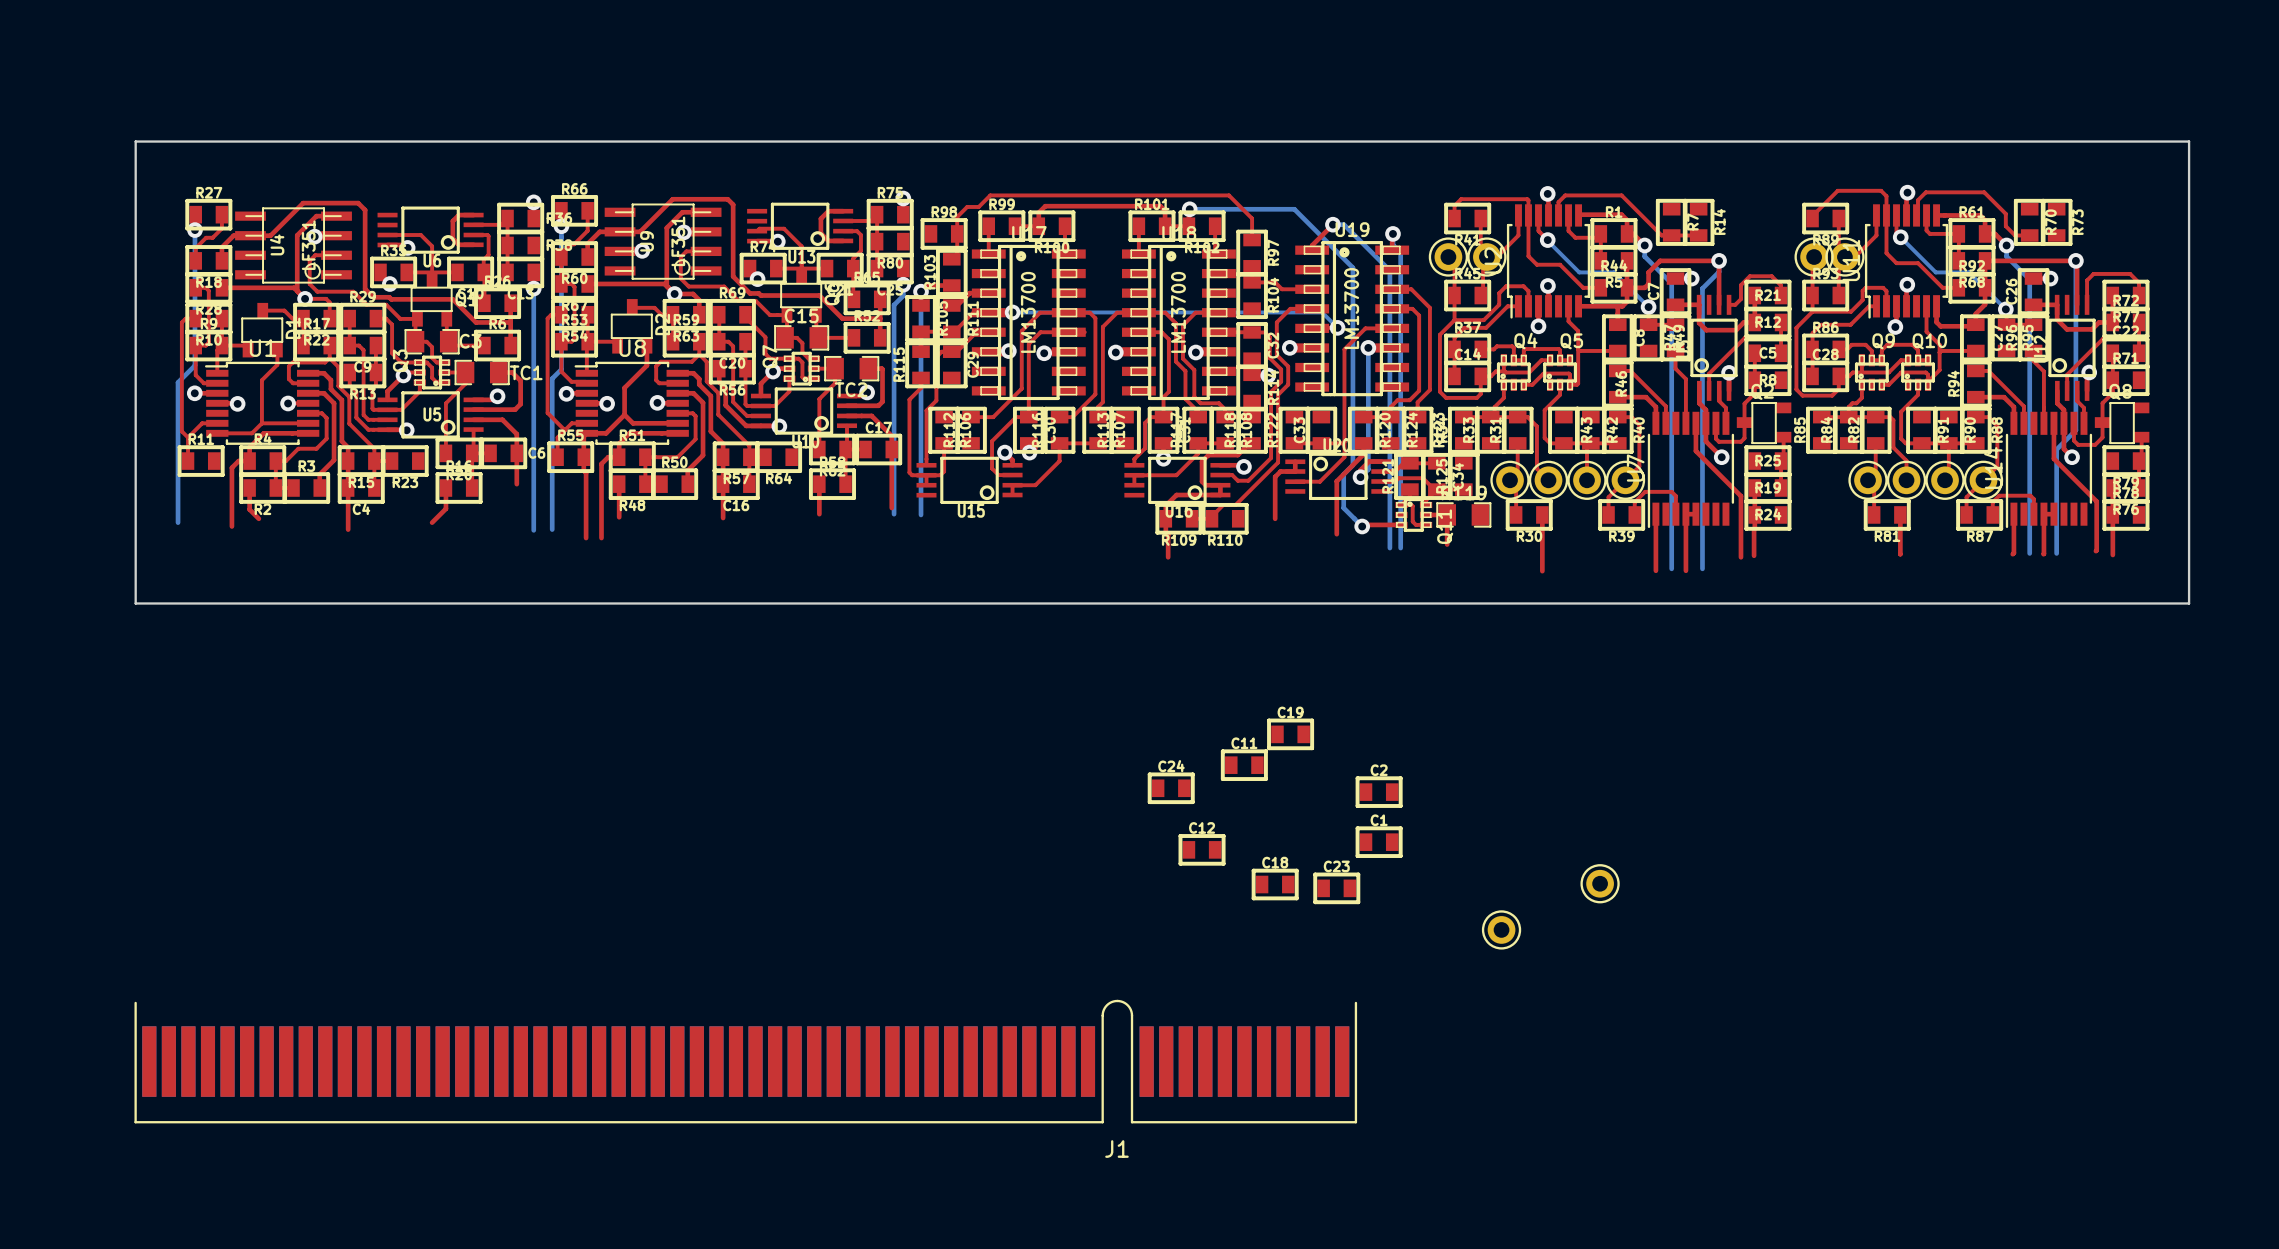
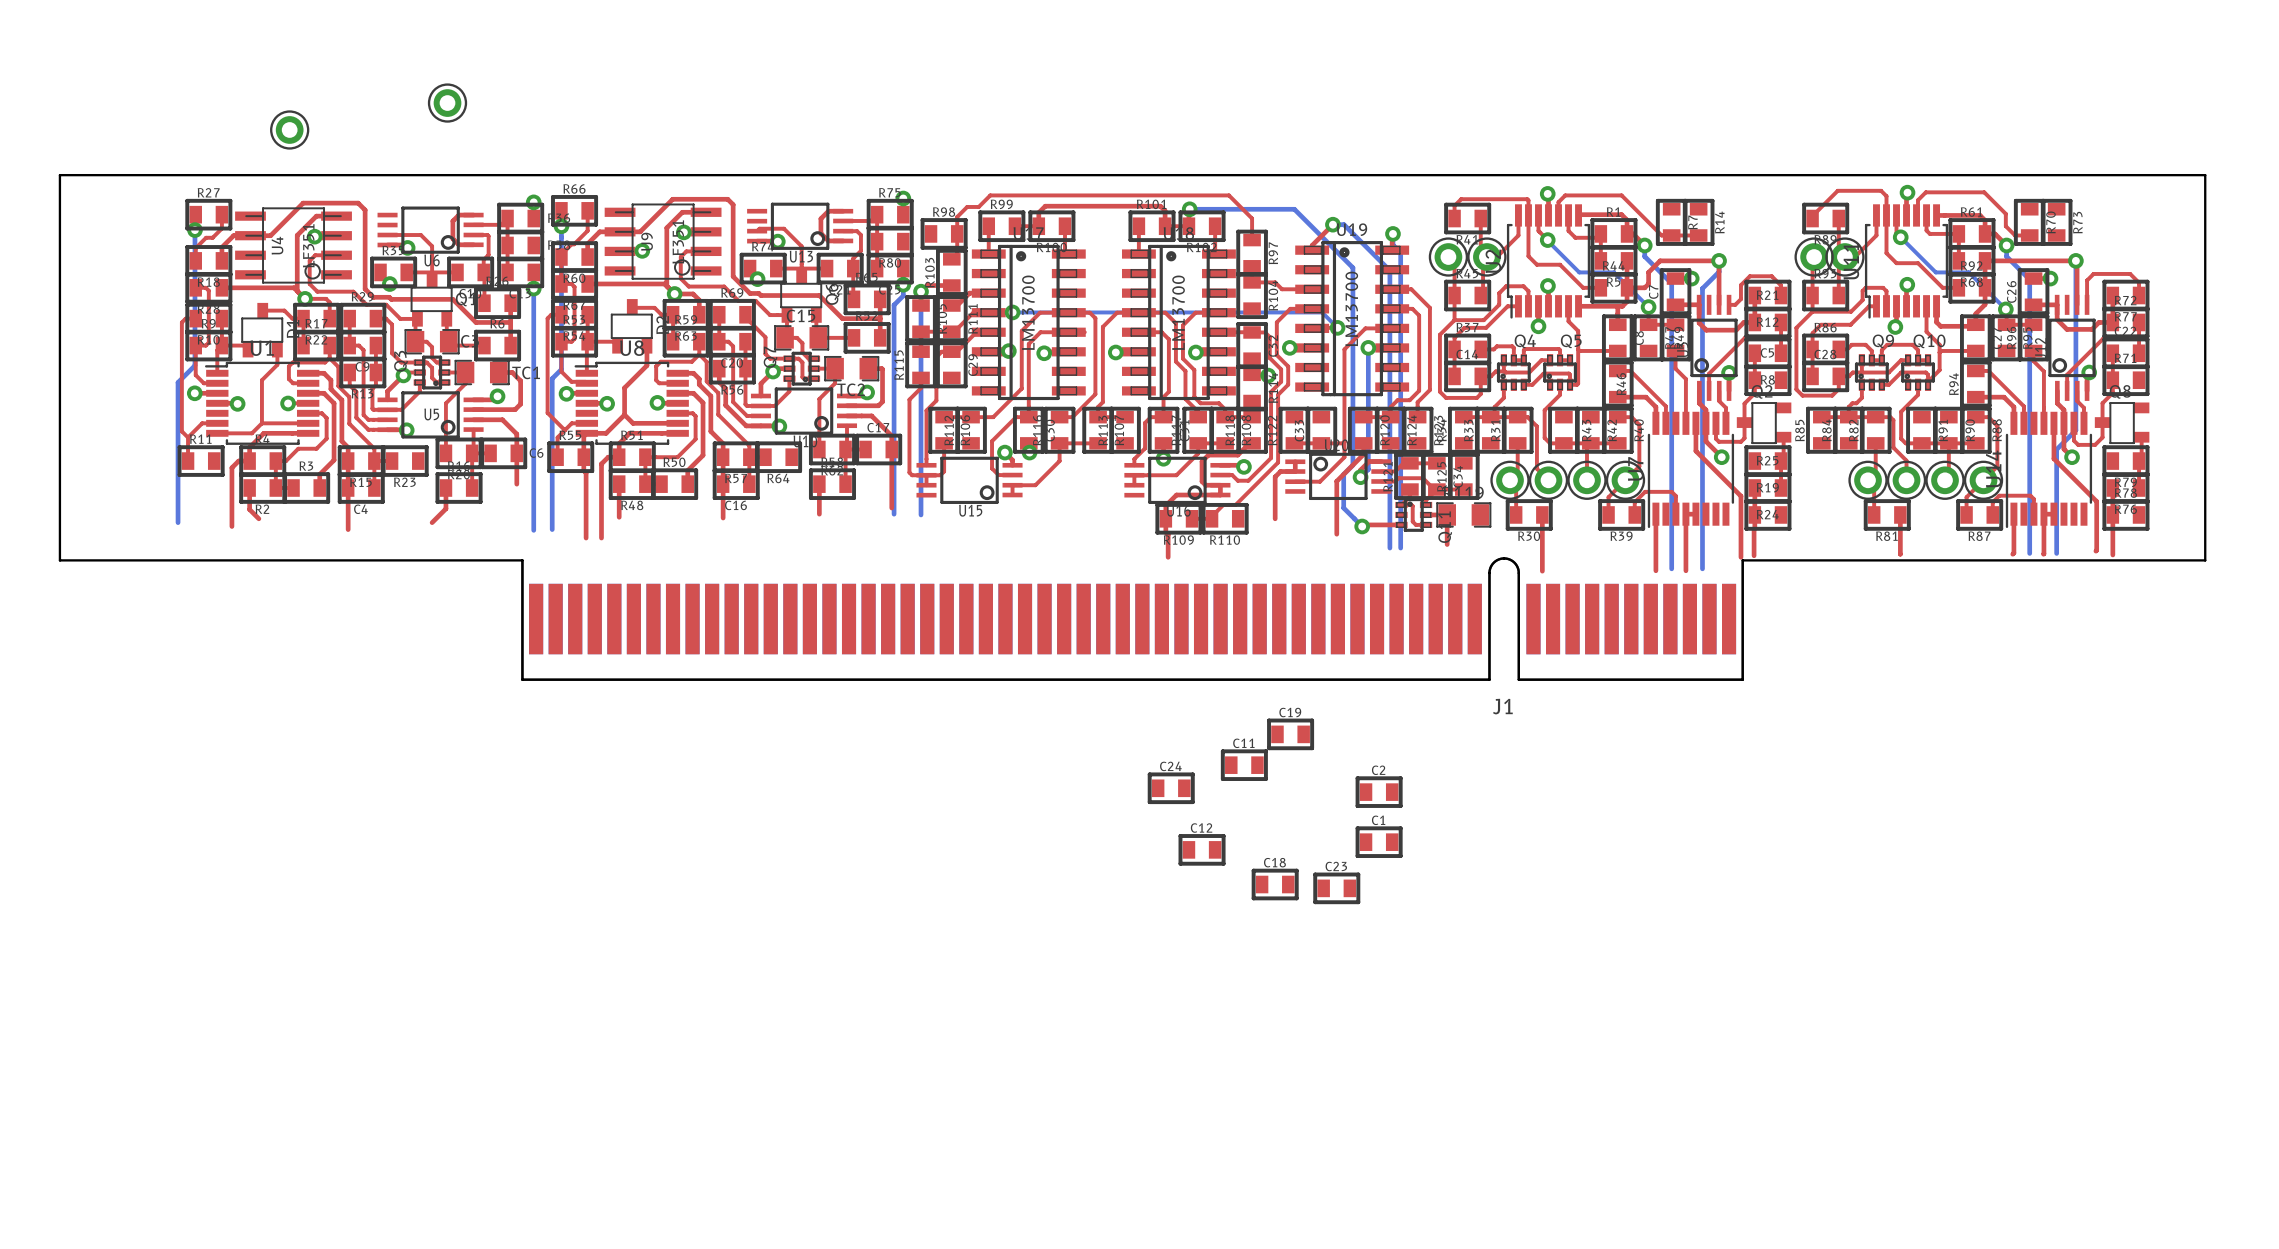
part: none -> (447, 103)
part: none -> (289, 129)
board edge: (135, 141) (2189, 141) (2189, 603) (135, 603) (135, 141) -> (59, 175) (59, 560) (522, 560) (522, 679) (1489, 679) (1489, 571) (1493, 562) (1504, 558) (1514, 562) (1518, 571) (1518, 679) (1742, 679) (1742, 560) (2205, 560) (2205, 175) (59, 175)
part: (1600, 883) -> none
part: (1501, 929) -> none
J1 position: (745, 1061) -> (1132, 619)

